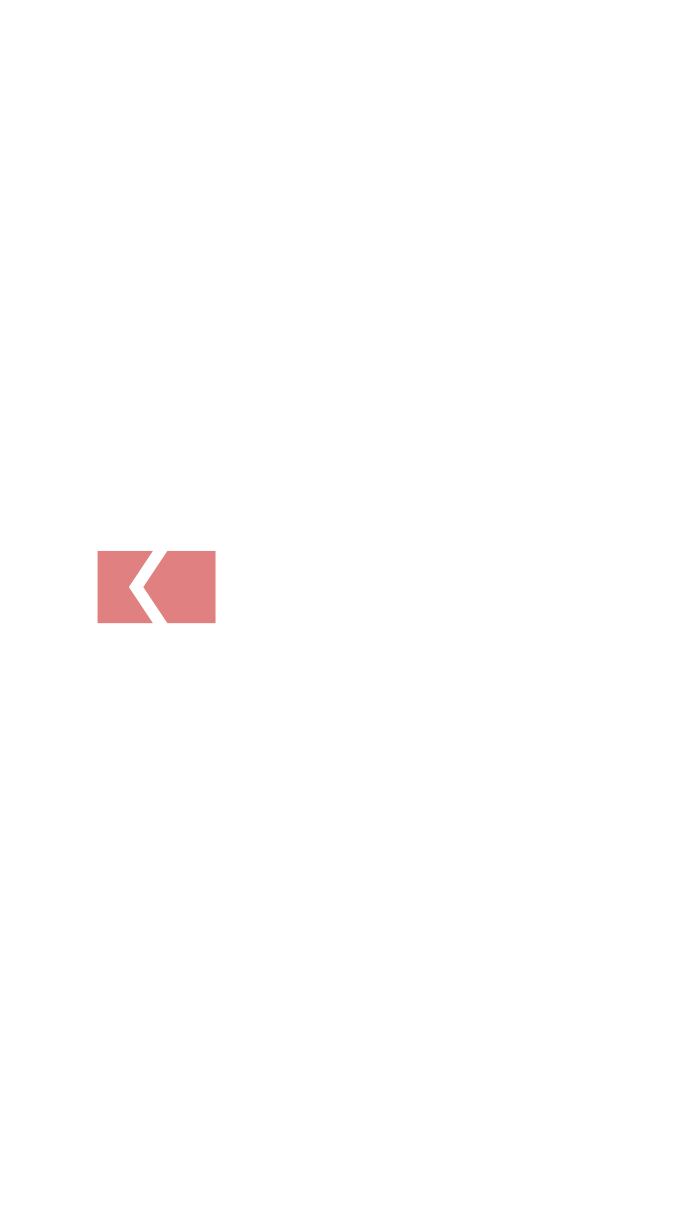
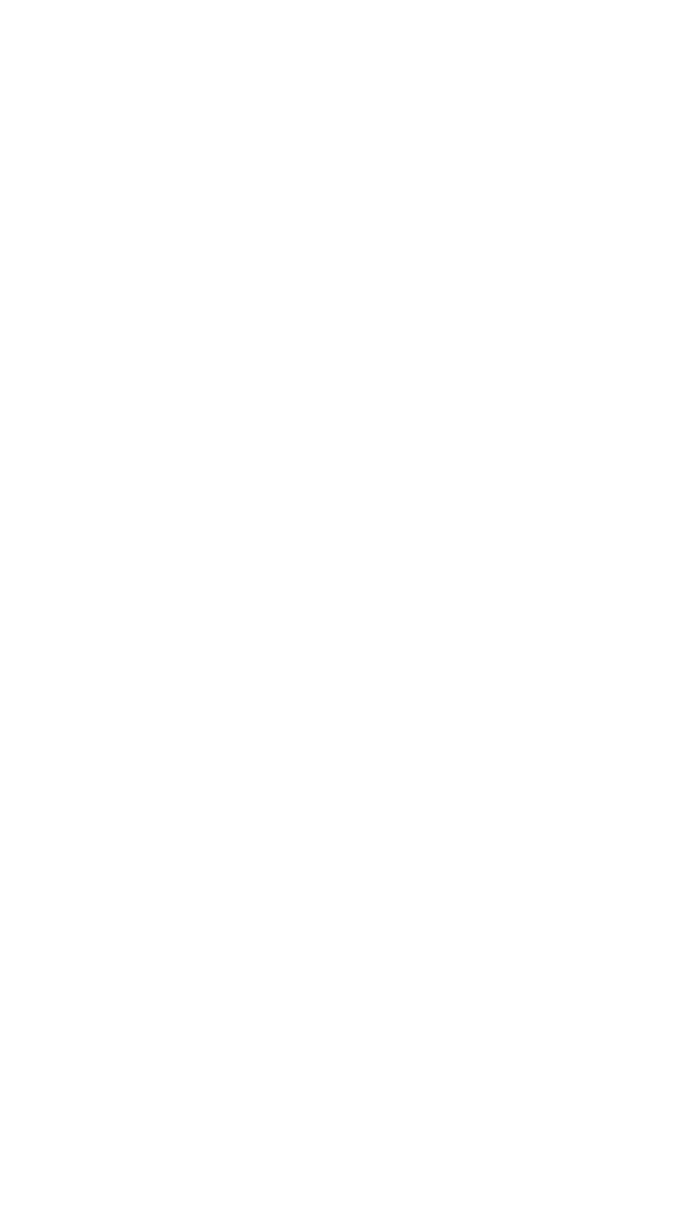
part: (156, 587) -> none

